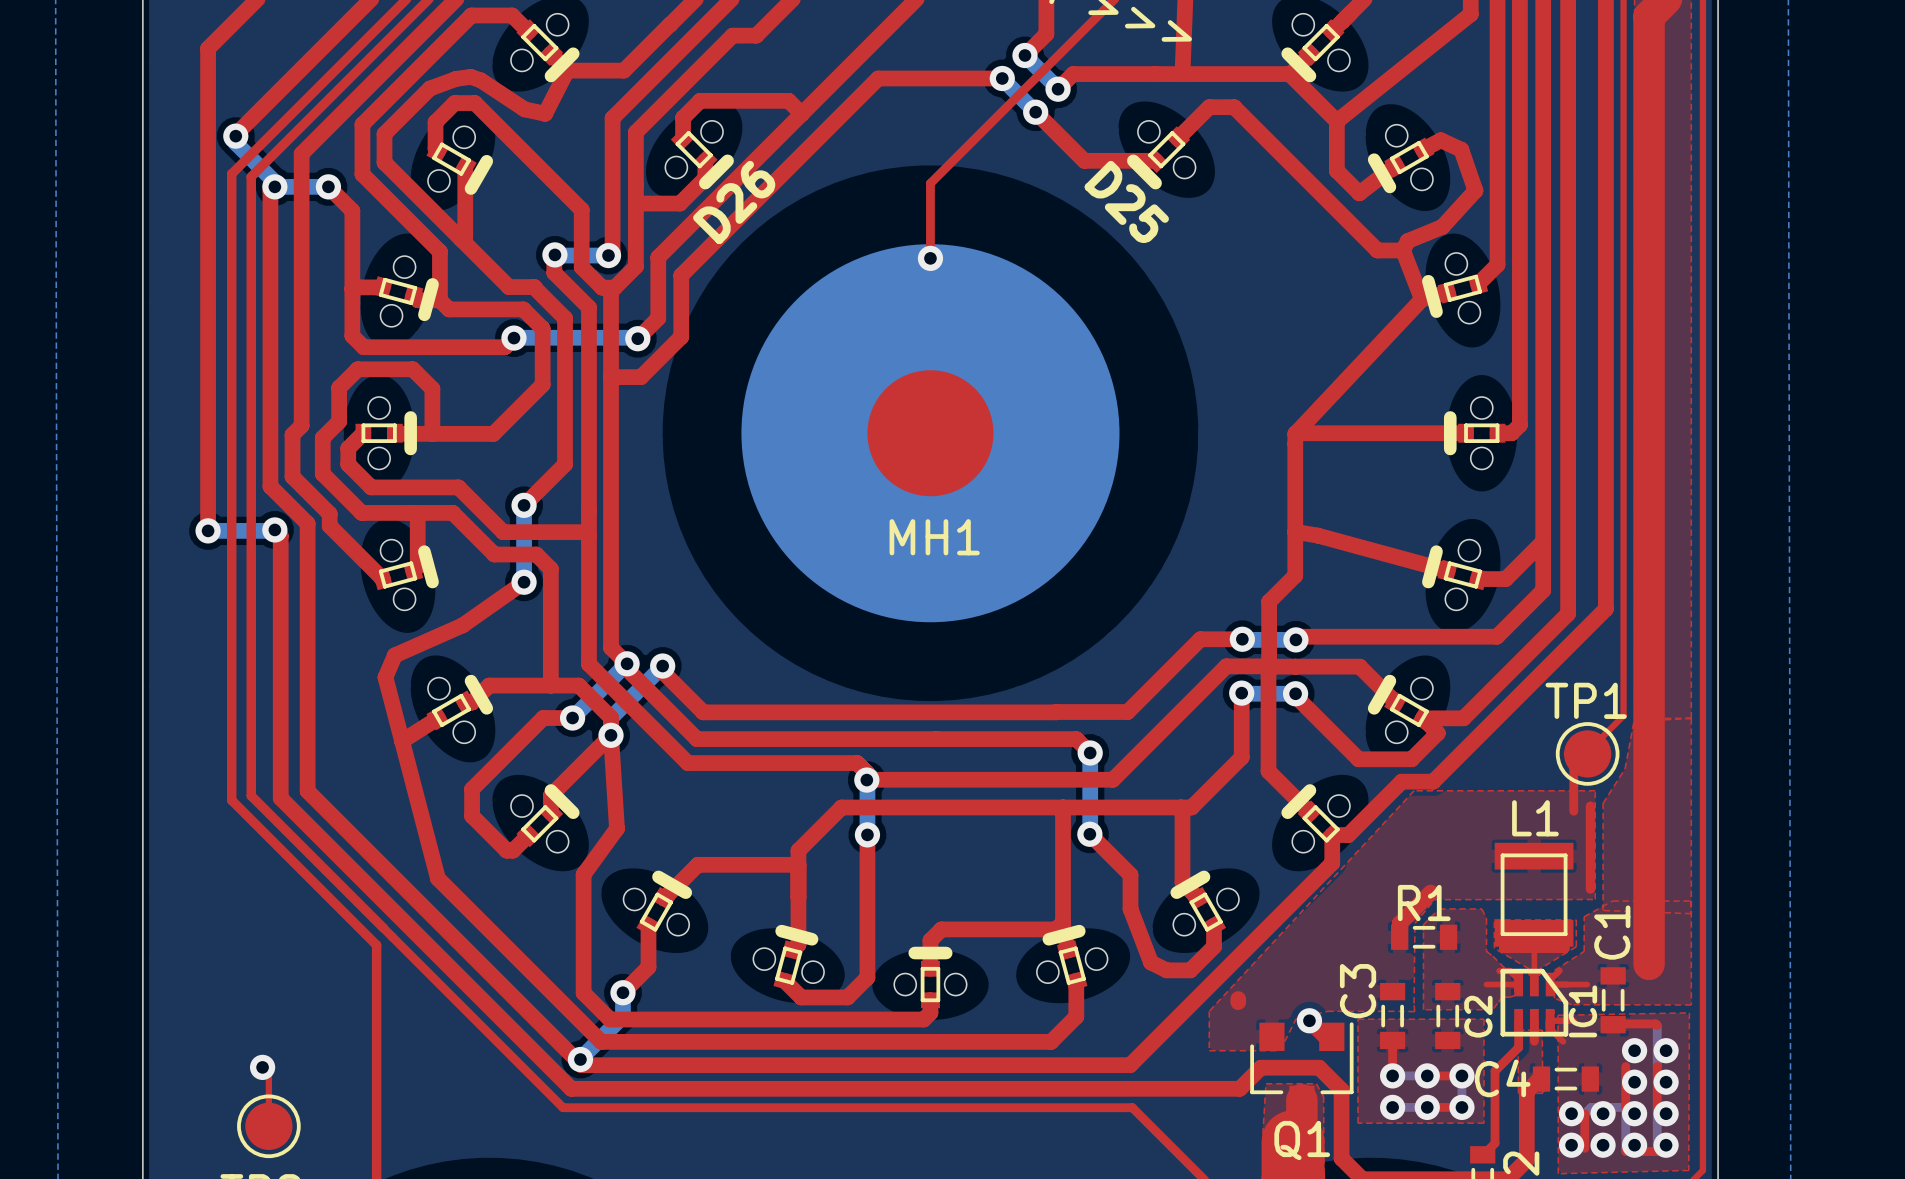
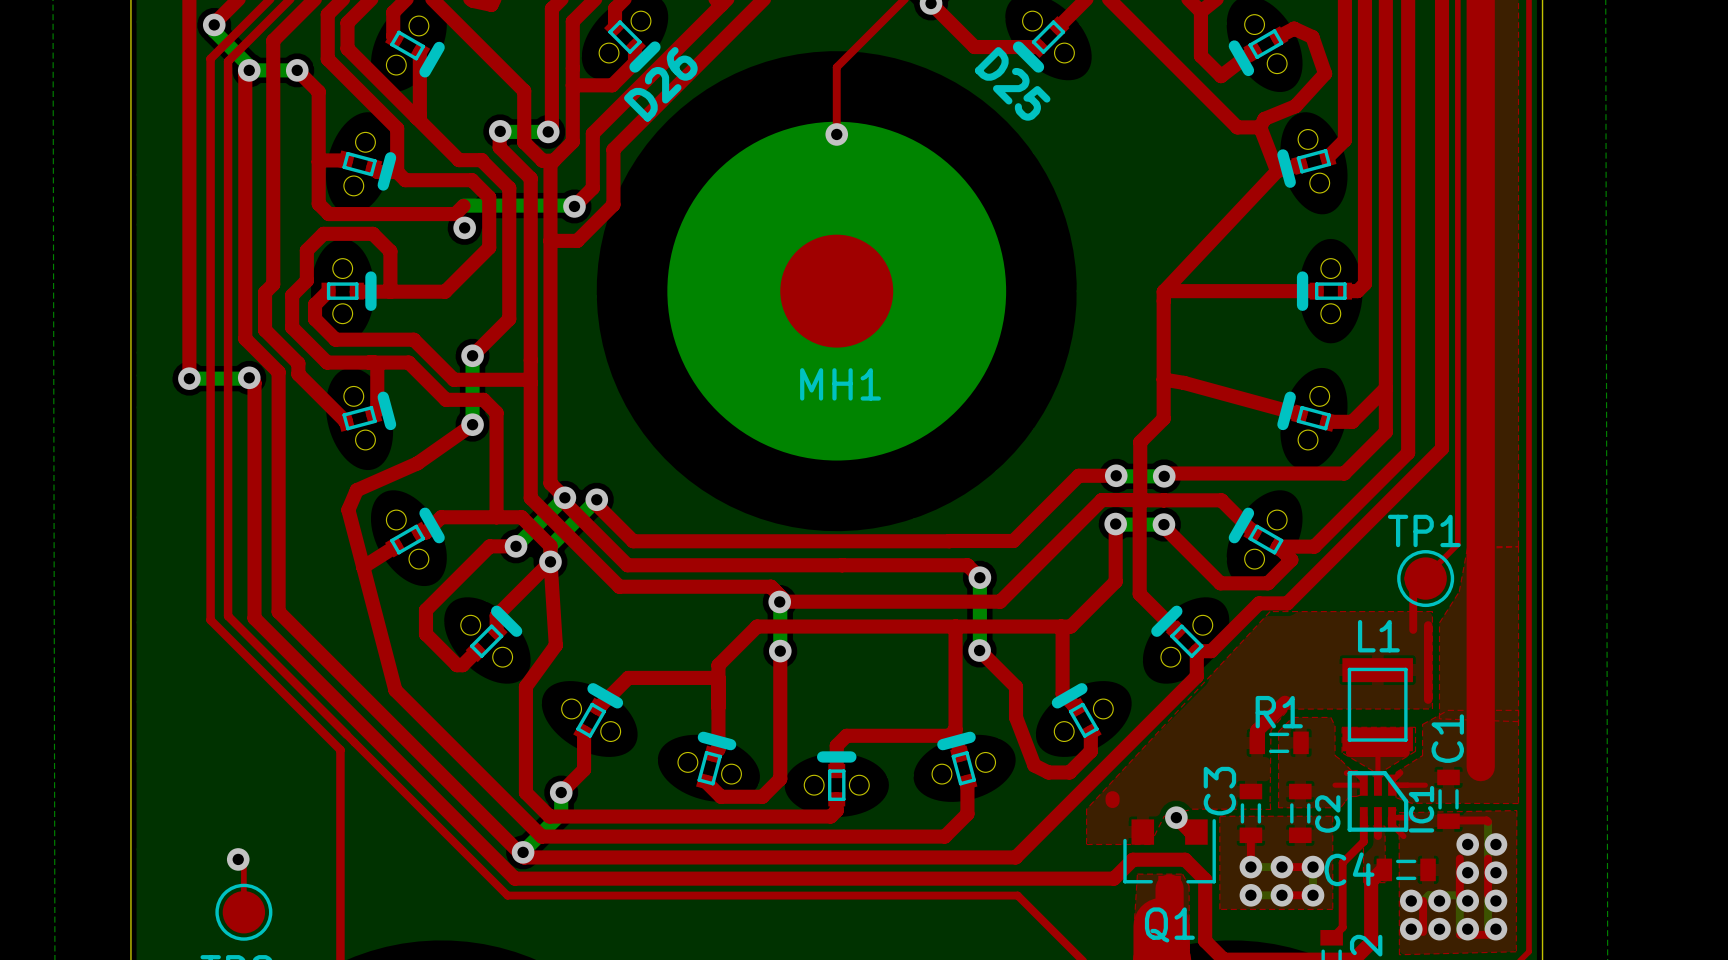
via position: (513, 338) -> (464, 227)

